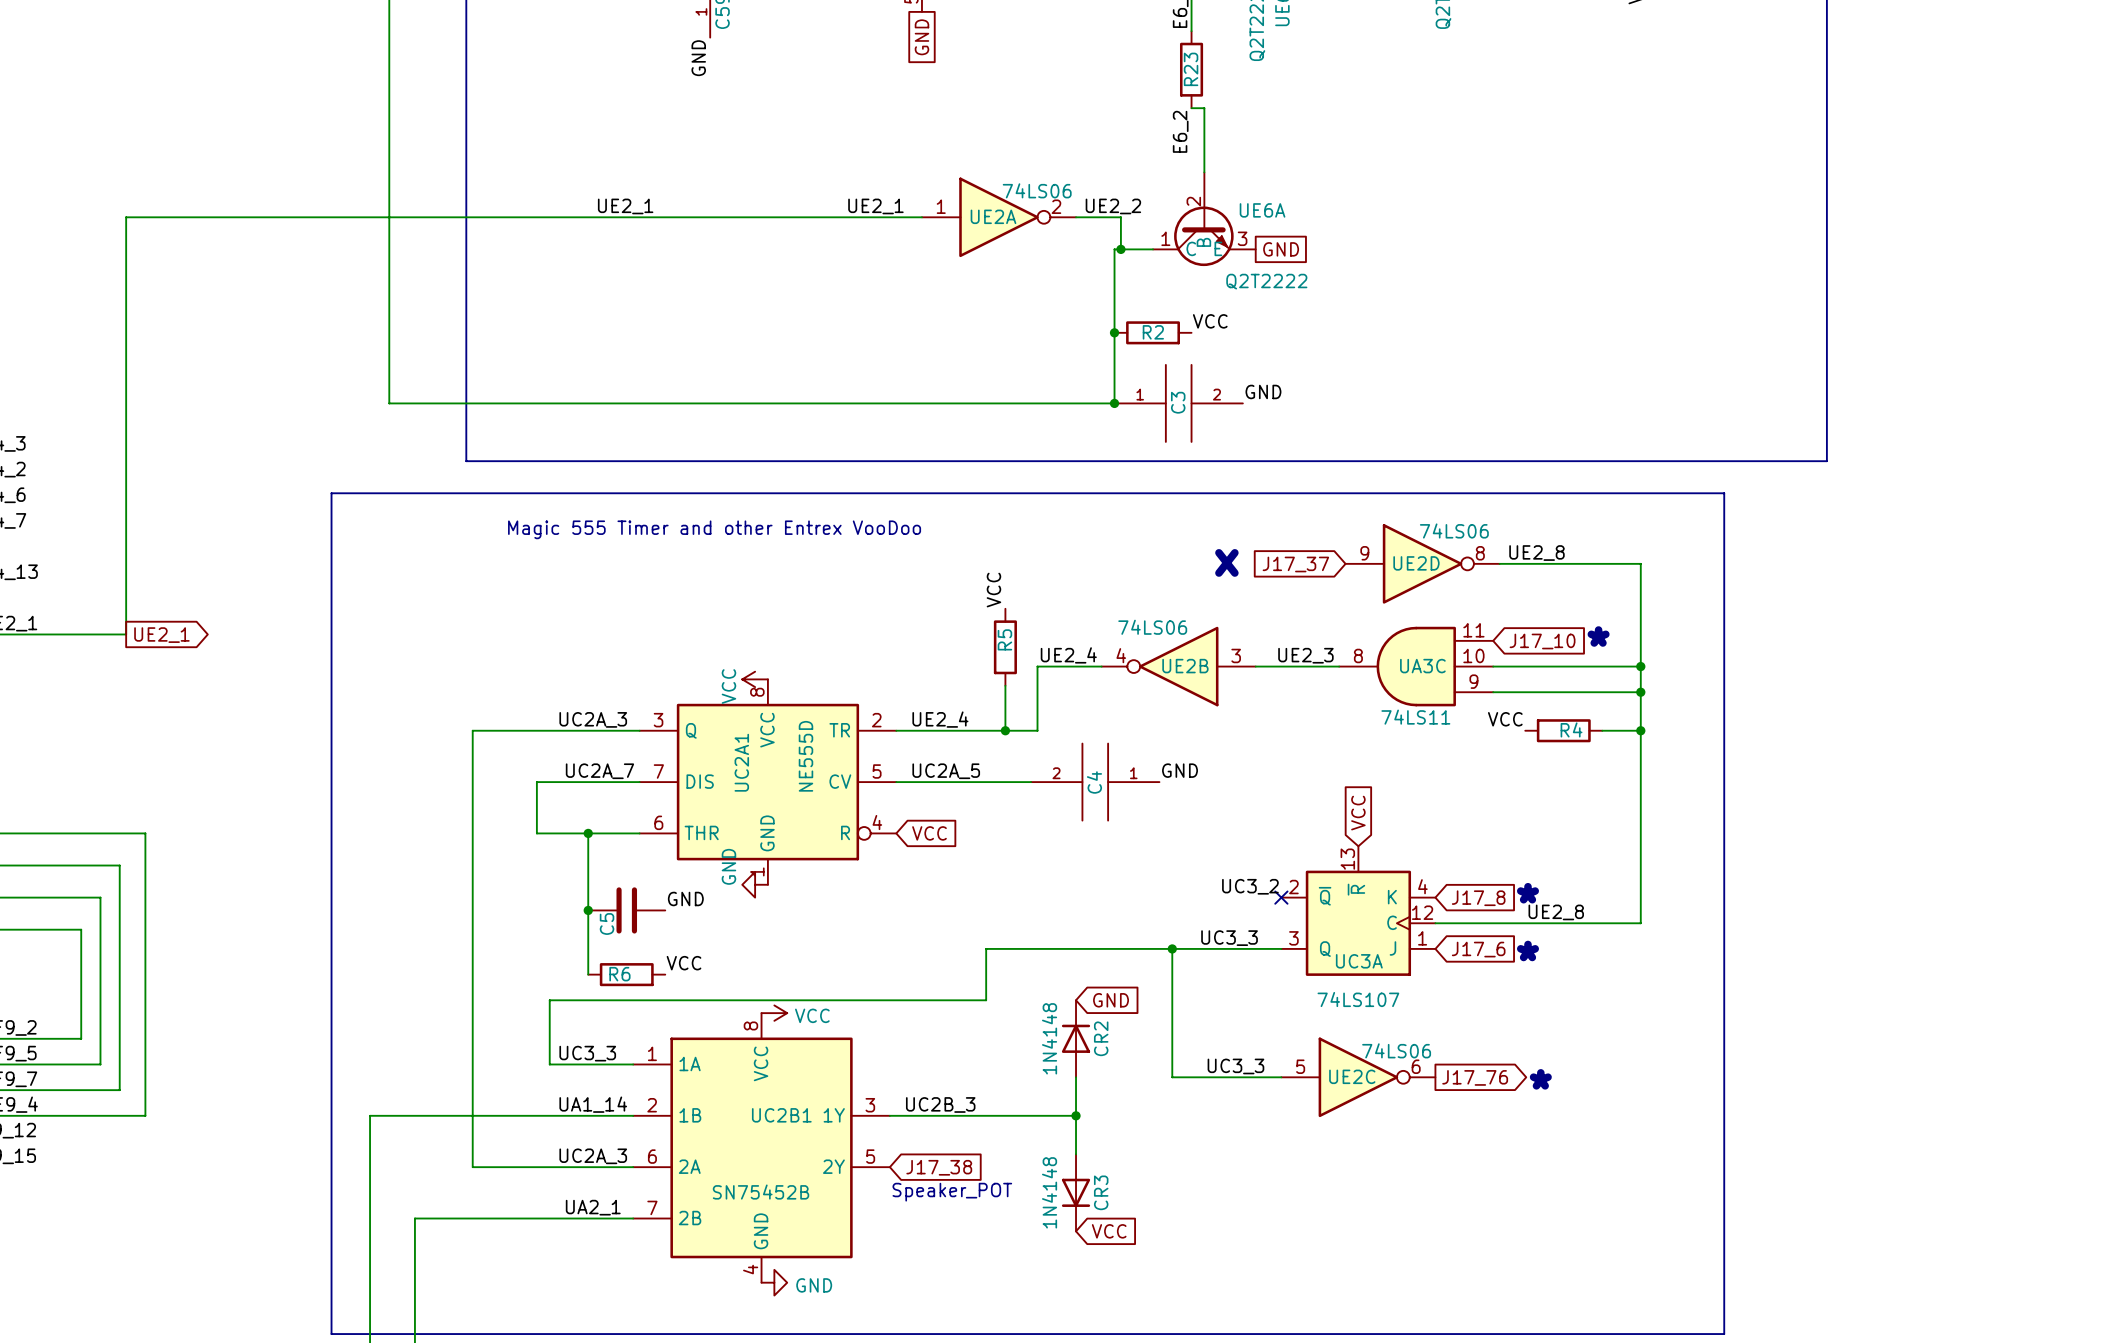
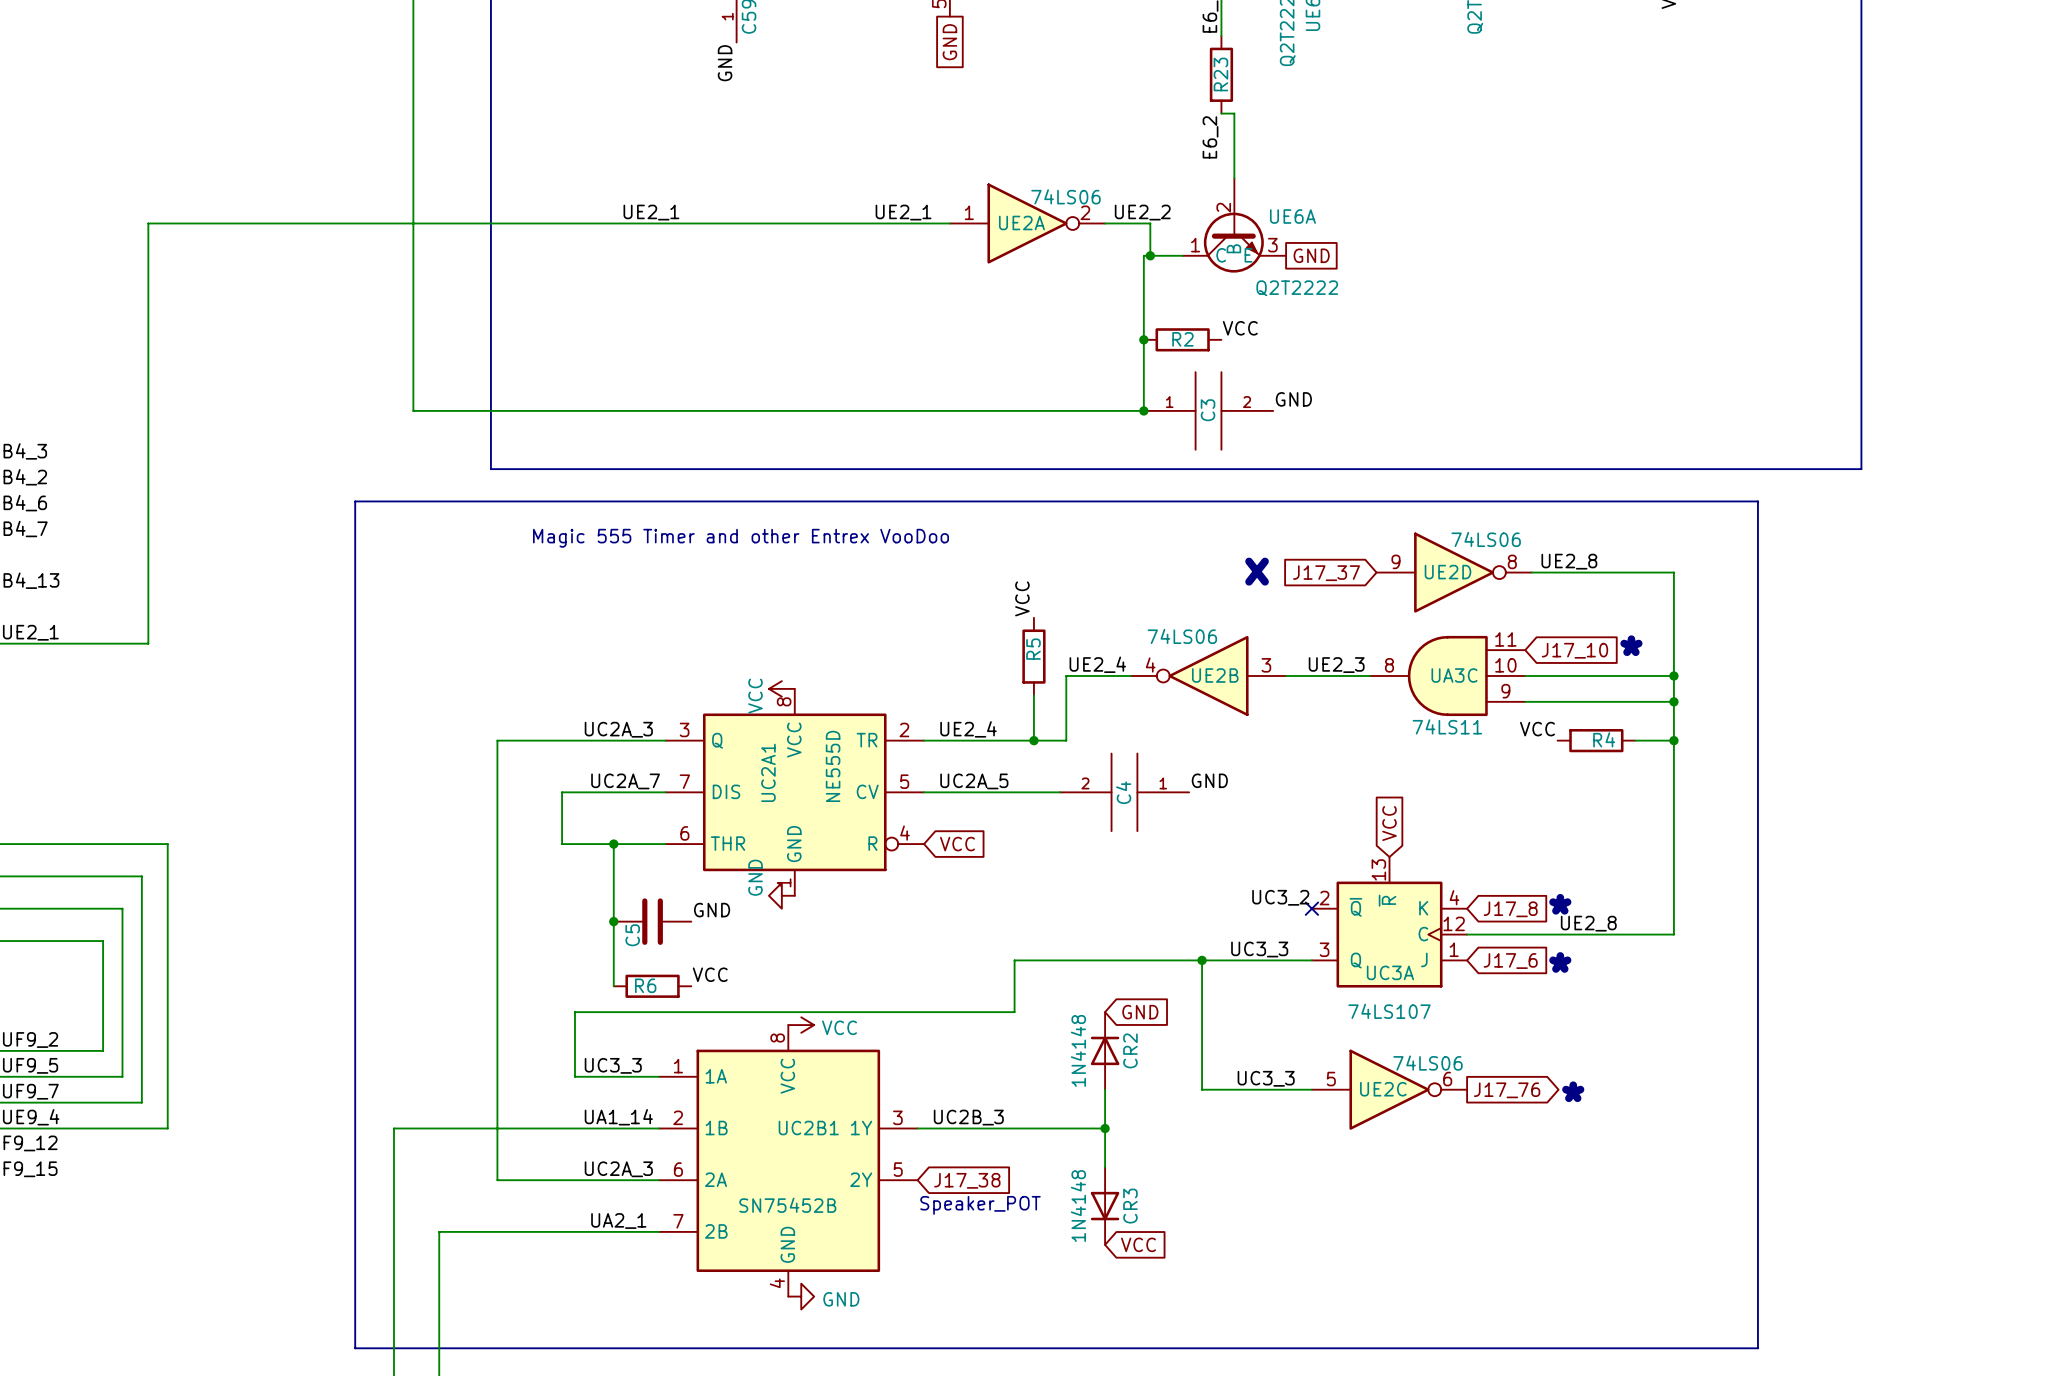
global label: UE2_1 (161, 635) -> none

